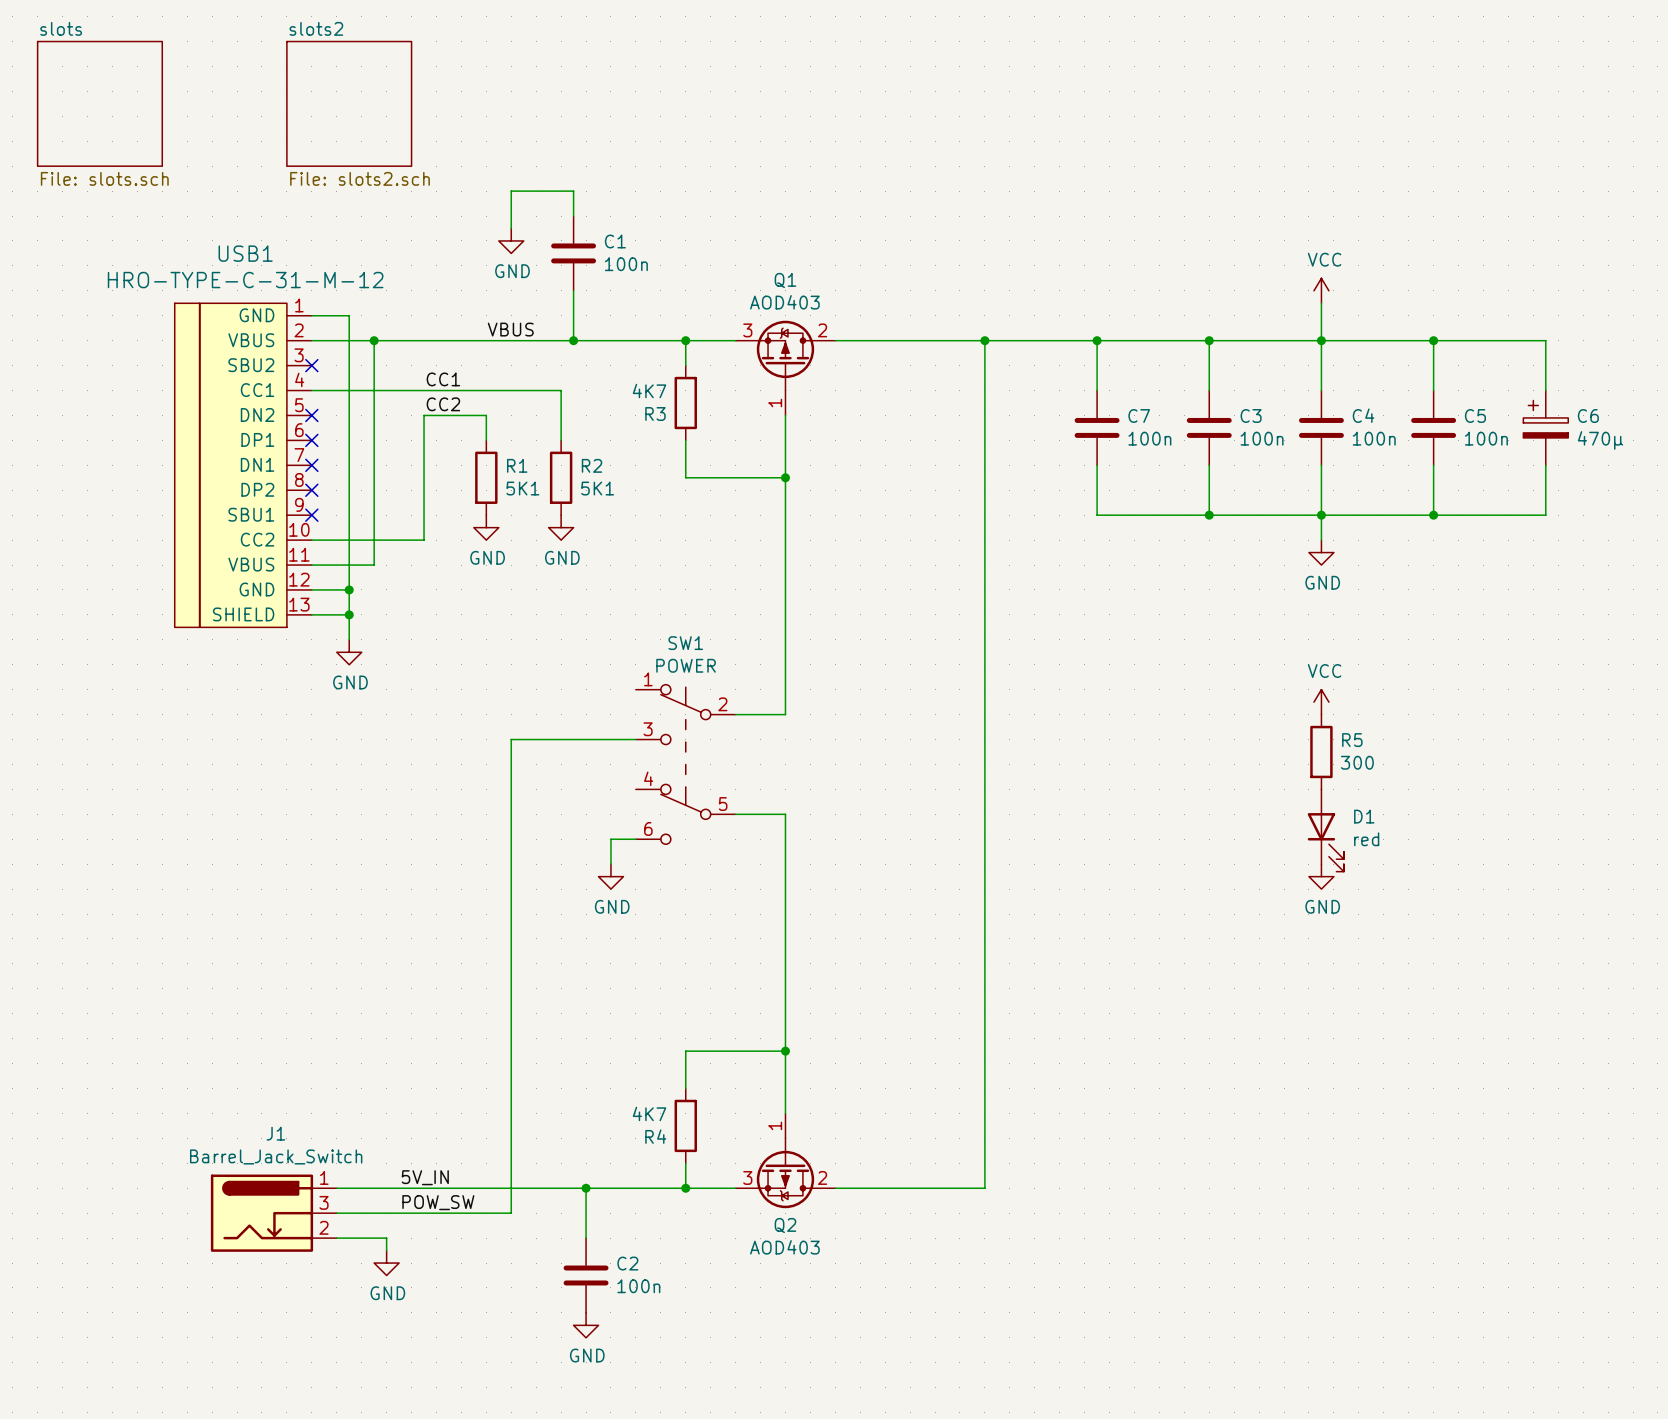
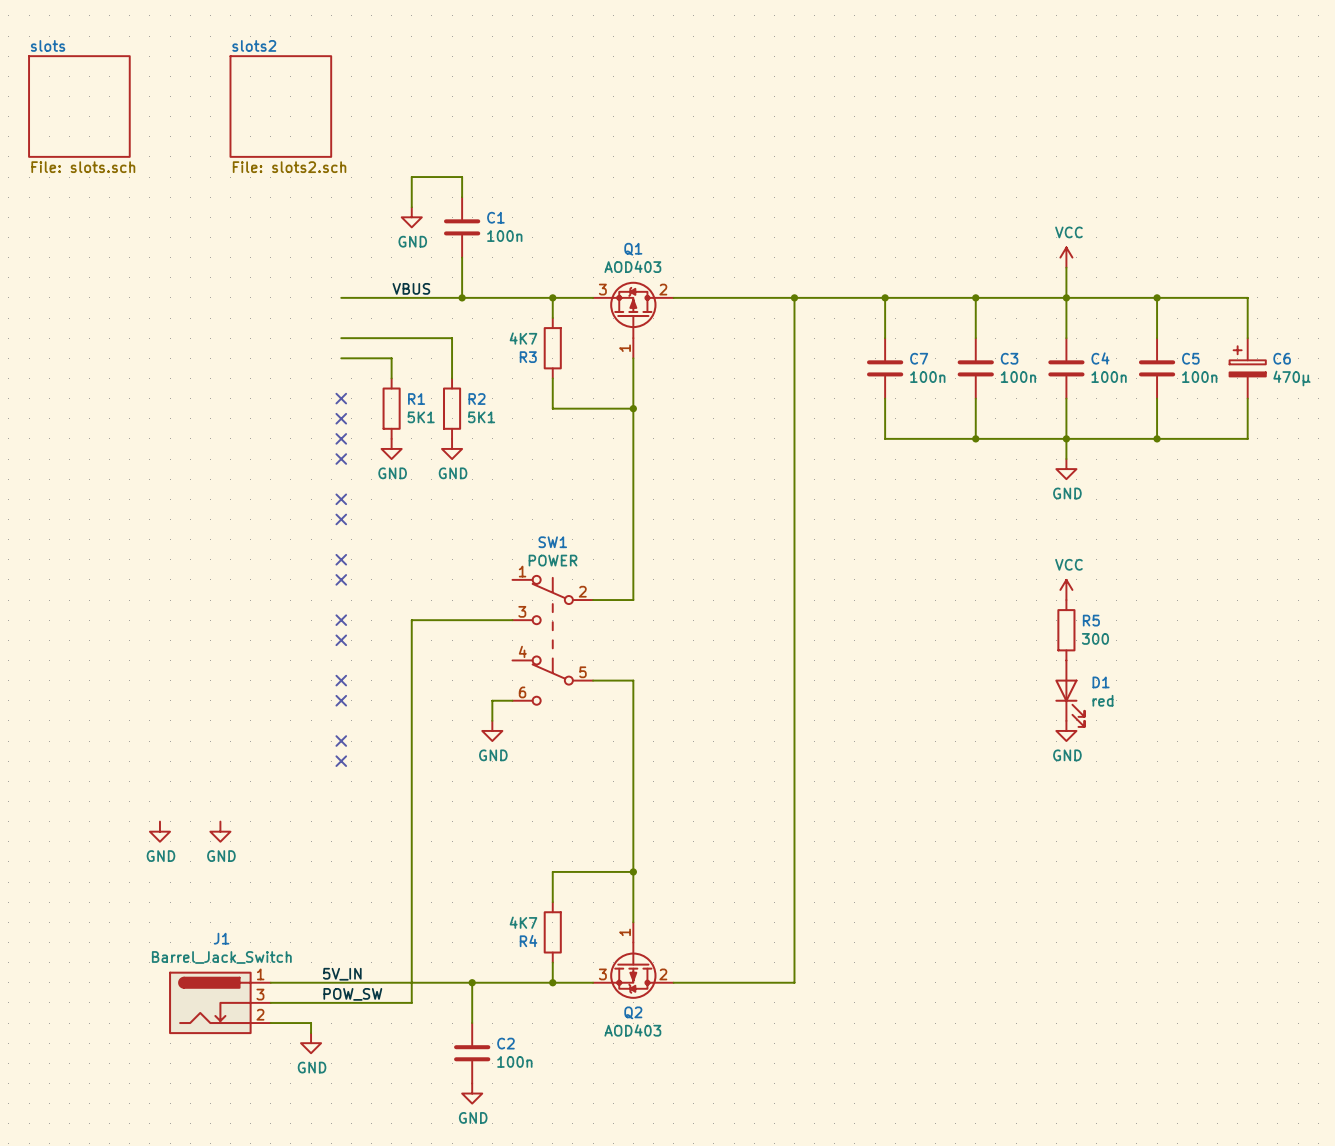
wire: (311, 315) (349, 315) (349, 639) -> none
wire: (311, 340) (424, 340) -> none
wire: (374, 340) (374, 565) (311, 565) -> none
junction: (374, 340) -> none
no-connect mark: (311, 365) -> none
label: CC1 (443, 379) -> none
wire: (311, 390) (424, 390) -> none
label: CC2 (443, 404) -> none
no-connect mark: (311, 415) -> none
wire: (424, 415) (424, 540) (311, 540) -> none
no-connect mark: (311, 440) -> none
USB1: HRO-TYPE-C-31-M-12 (243, 465) -> none
no-connect mark: (311, 465) -> none
no-connect mark: none -> (341, 398)
no-connect mark: (311, 490) -> none
no-connect mark: none -> (341, 418)
no-connect mark: (311, 515) -> none
no-connect mark: none -> (341, 438)
no-connect mark: none -> (341, 459)
wire: (311, 589) (349, 589) -> none
junction: (349, 589) -> none
no-connect mark: none -> (341, 499)
wire: (311, 614) (349, 614) -> none
junction: (349, 614) -> none
no-connect mark: none -> (341, 519)
power symbol: GND (349, 652) -> none
no-connect mark: none -> (341, 559)
no-connect mark: none -> (341, 579)
no-connect mark: none -> (341, 620)
no-connect mark: none -> (341, 640)
no-connect mark: none -> (341, 680)
no-connect mark: none -> (341, 700)
no-connect mark: none -> (341, 741)
no-connect mark: none -> (341, 761)
power symbol: none -> GND (159, 831)
power symbol: none -> GND (220, 831)

